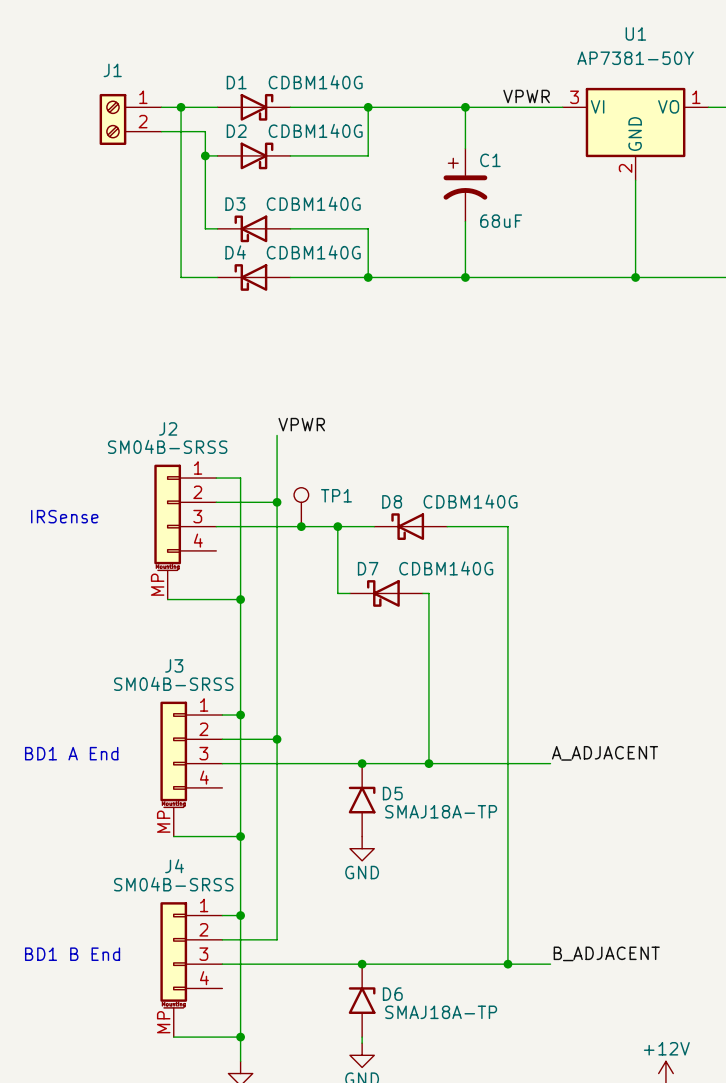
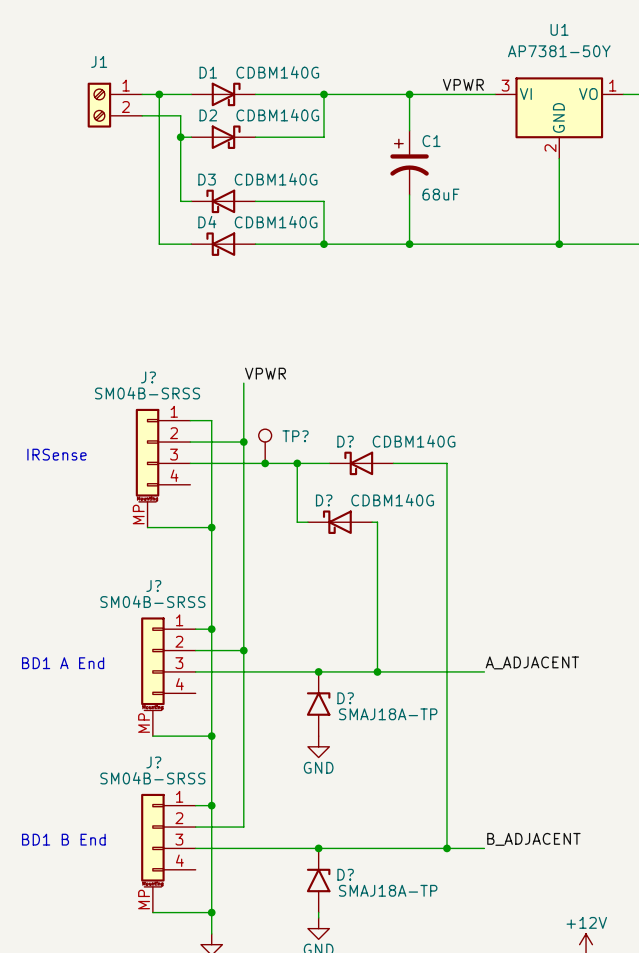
J2 name: J2 (168, 428) -> J? (148, 377)
TP1 name: TP1 (336, 495) -> TP? (295, 436)
D8 name: D8 (392, 501) -> D? (345, 441)
D7 name: D7 (368, 568) -> D? (324, 500)
J3 name: J3 (174, 665) -> J? (153, 585)
D5 name: D5 (392, 793) -> D? (345, 698)
J4 name: J4 (174, 866) -> J? (153, 762)
D6 name: D6 (392, 994) -> D? (345, 874)

